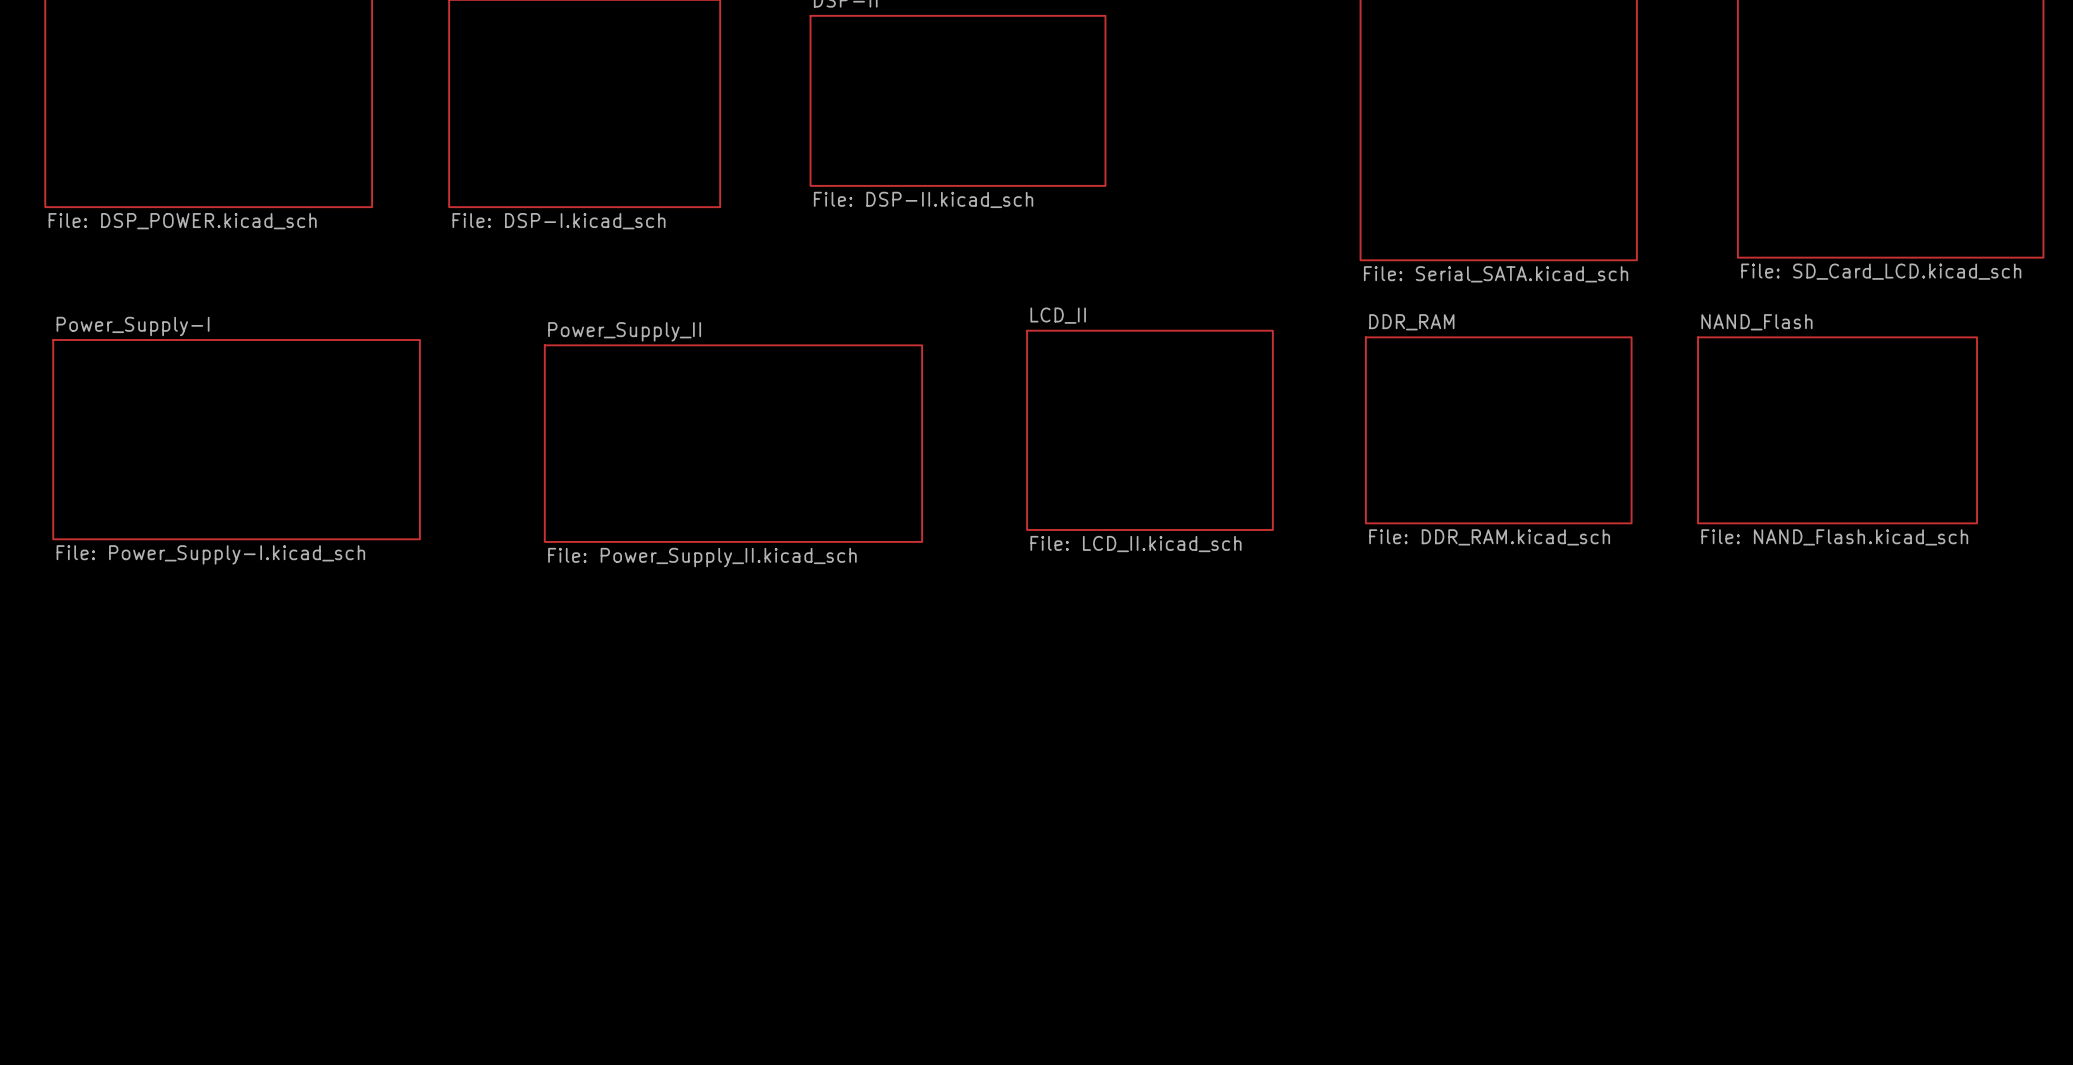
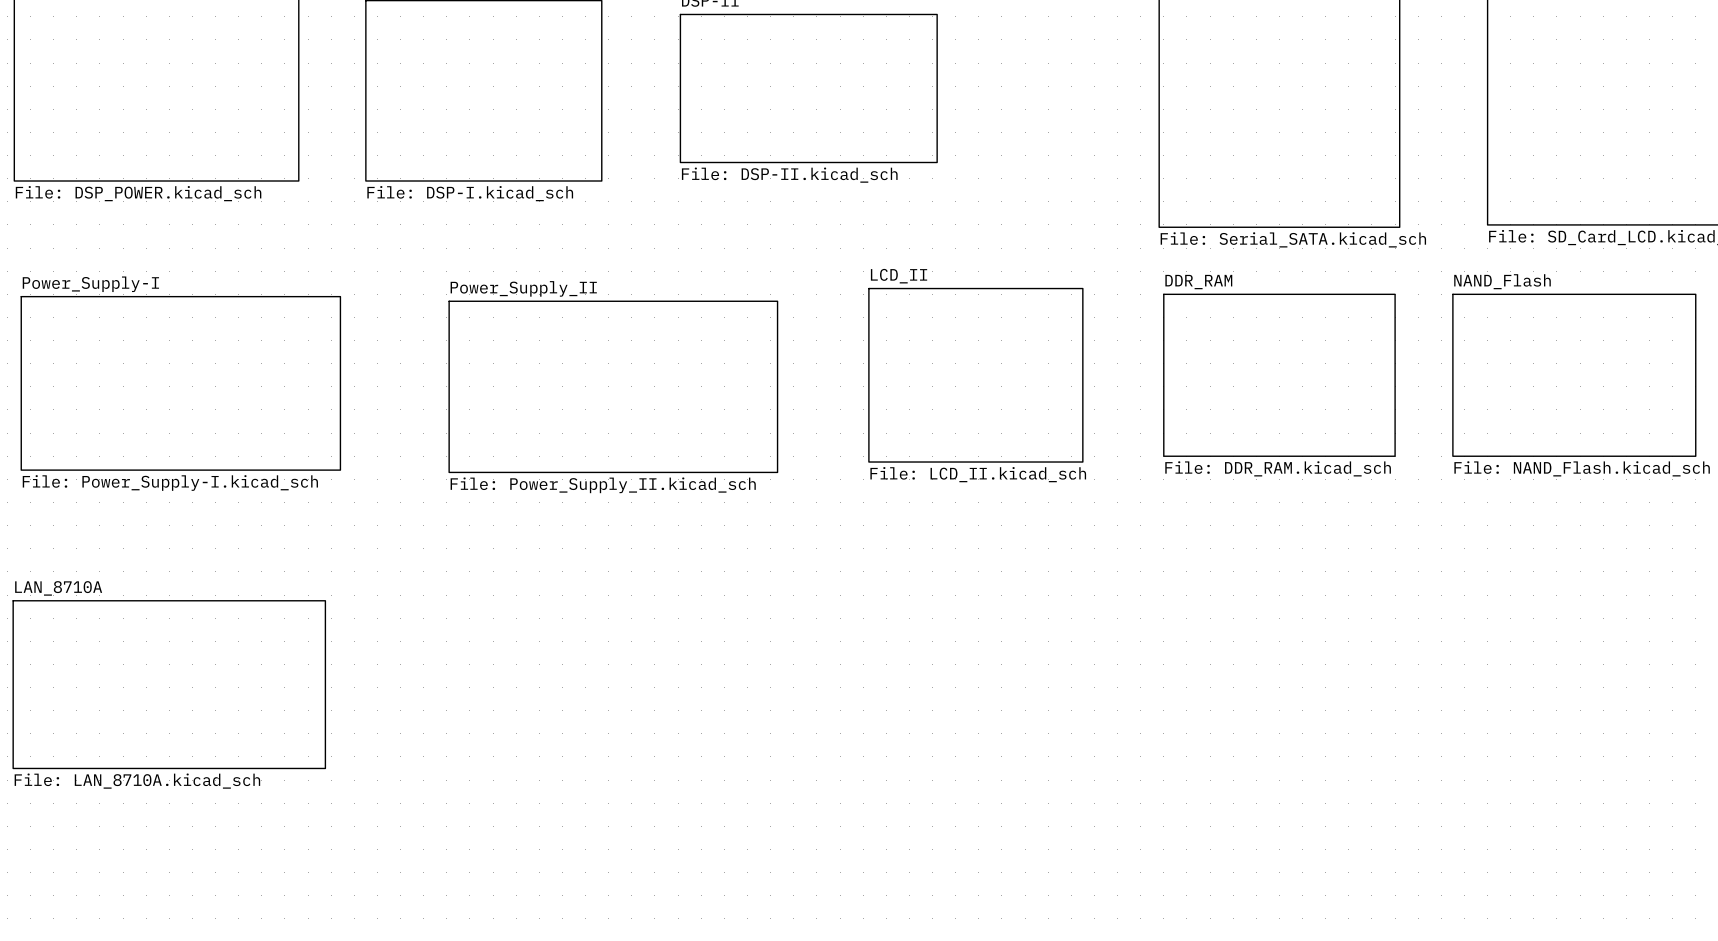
sheet LAN_8710A: none -> File: LAN_8710A.kicad_sch (169, 684)

